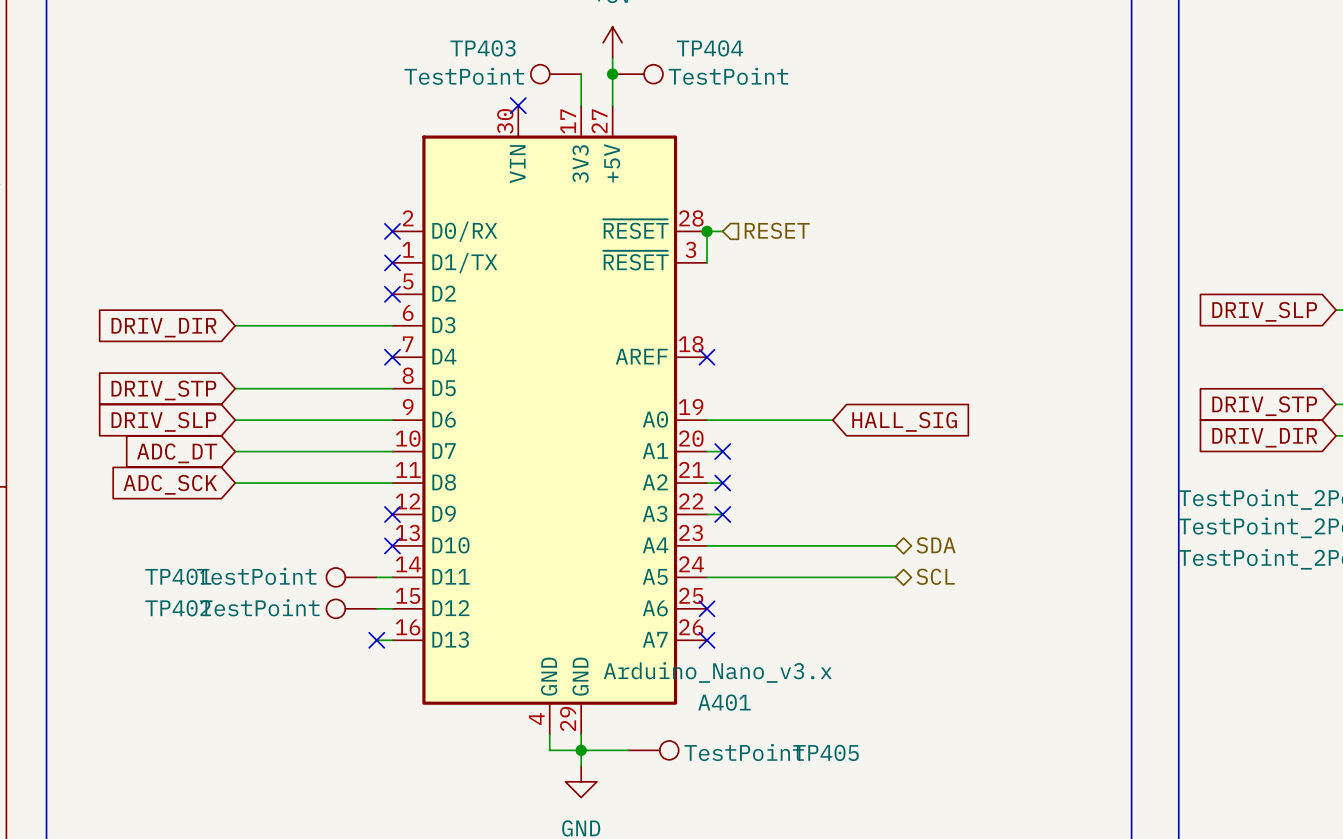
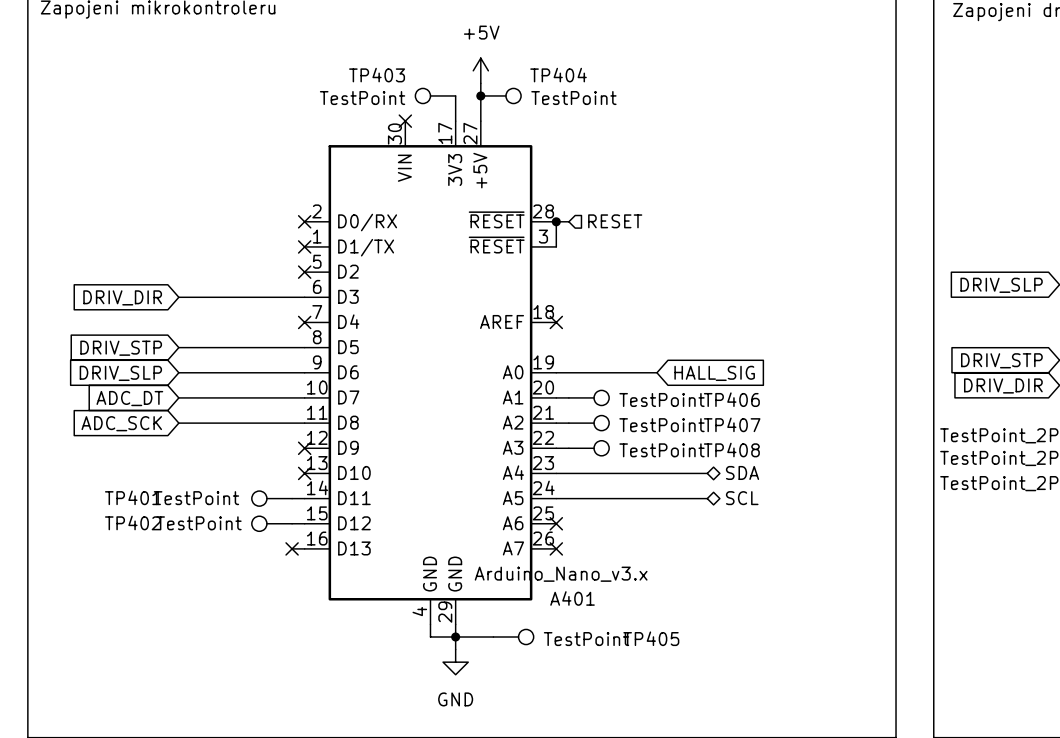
no-connect mark: (722, 451) -> none
TP406: none -> TestPoint (589, 397)
no-connect mark: (722, 483) -> none
TP407: none -> TestPoint (589, 423)
no-connect mark: (722, 514) -> none
TP408: none -> TestPoint (589, 448)

